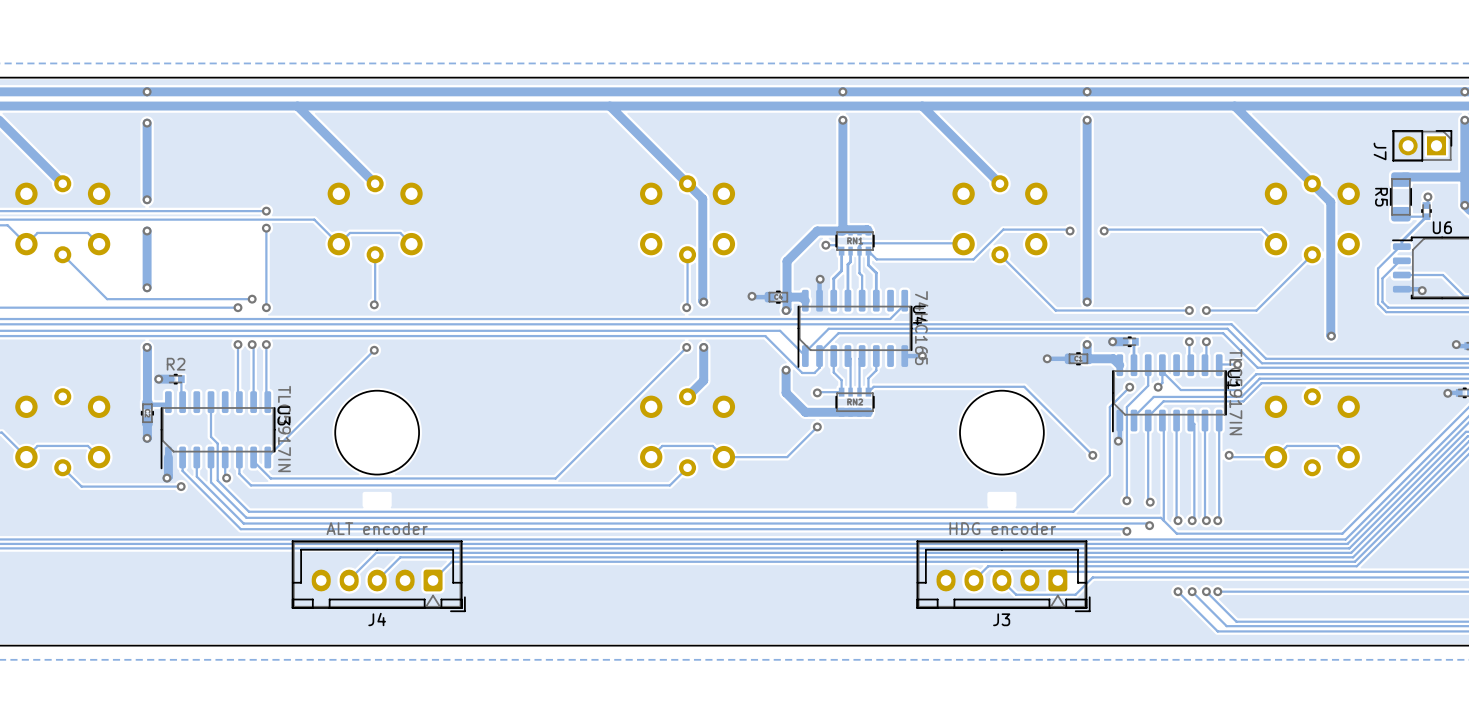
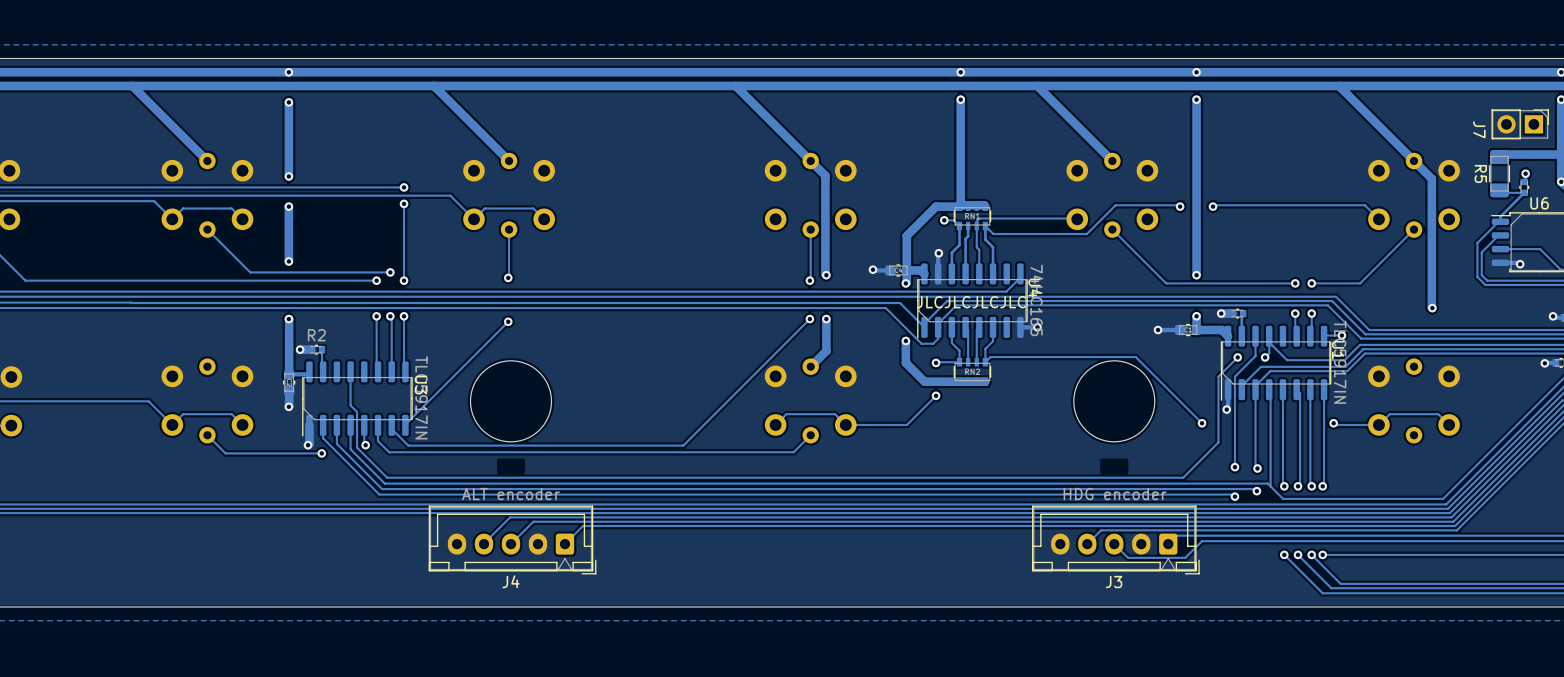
text: none -> JLCJLCJLCJLC (971, 302)

